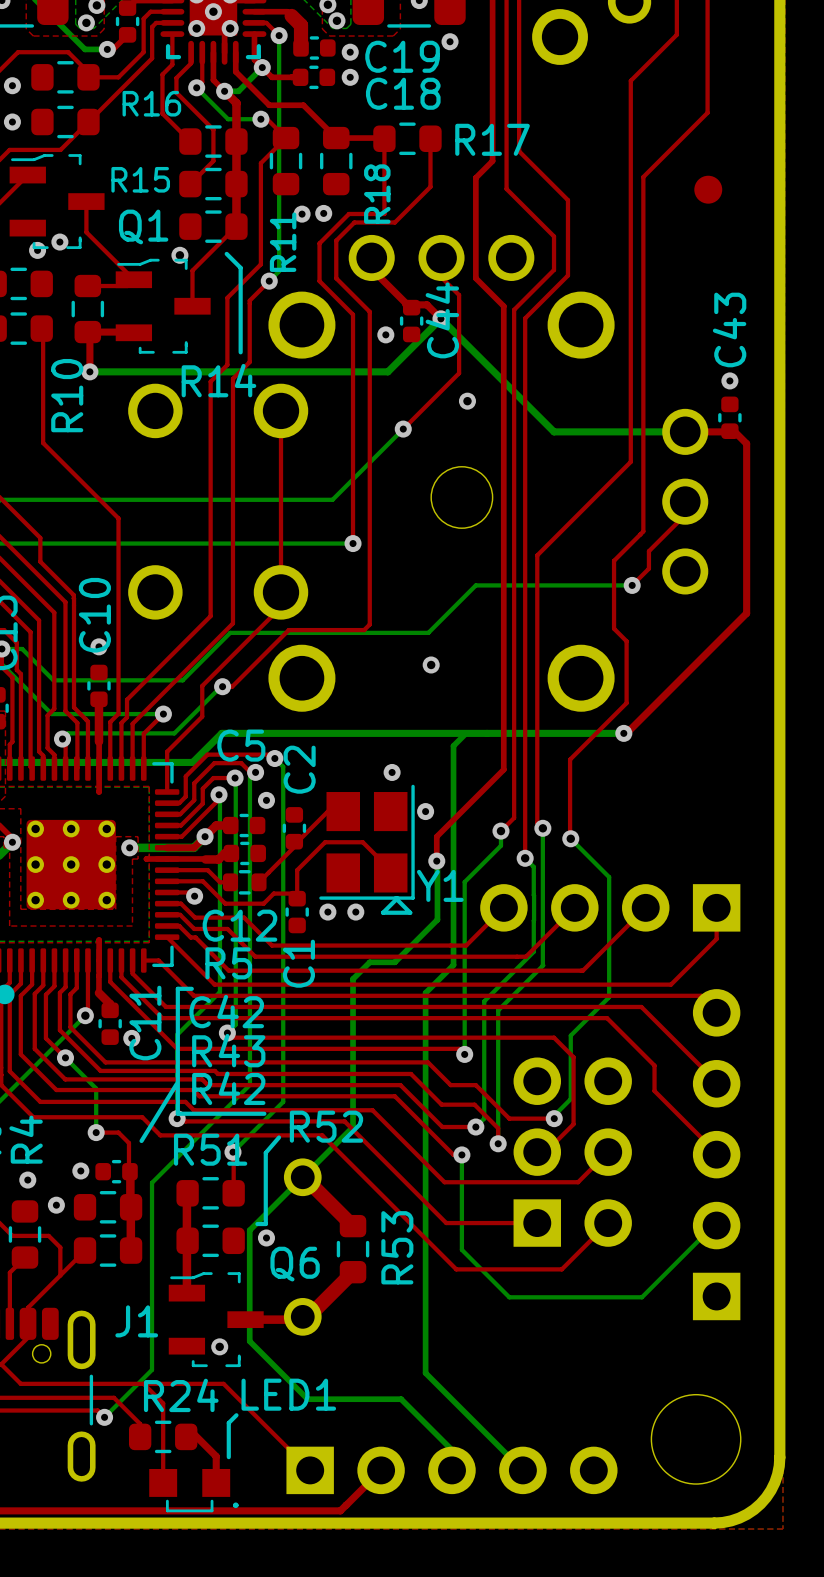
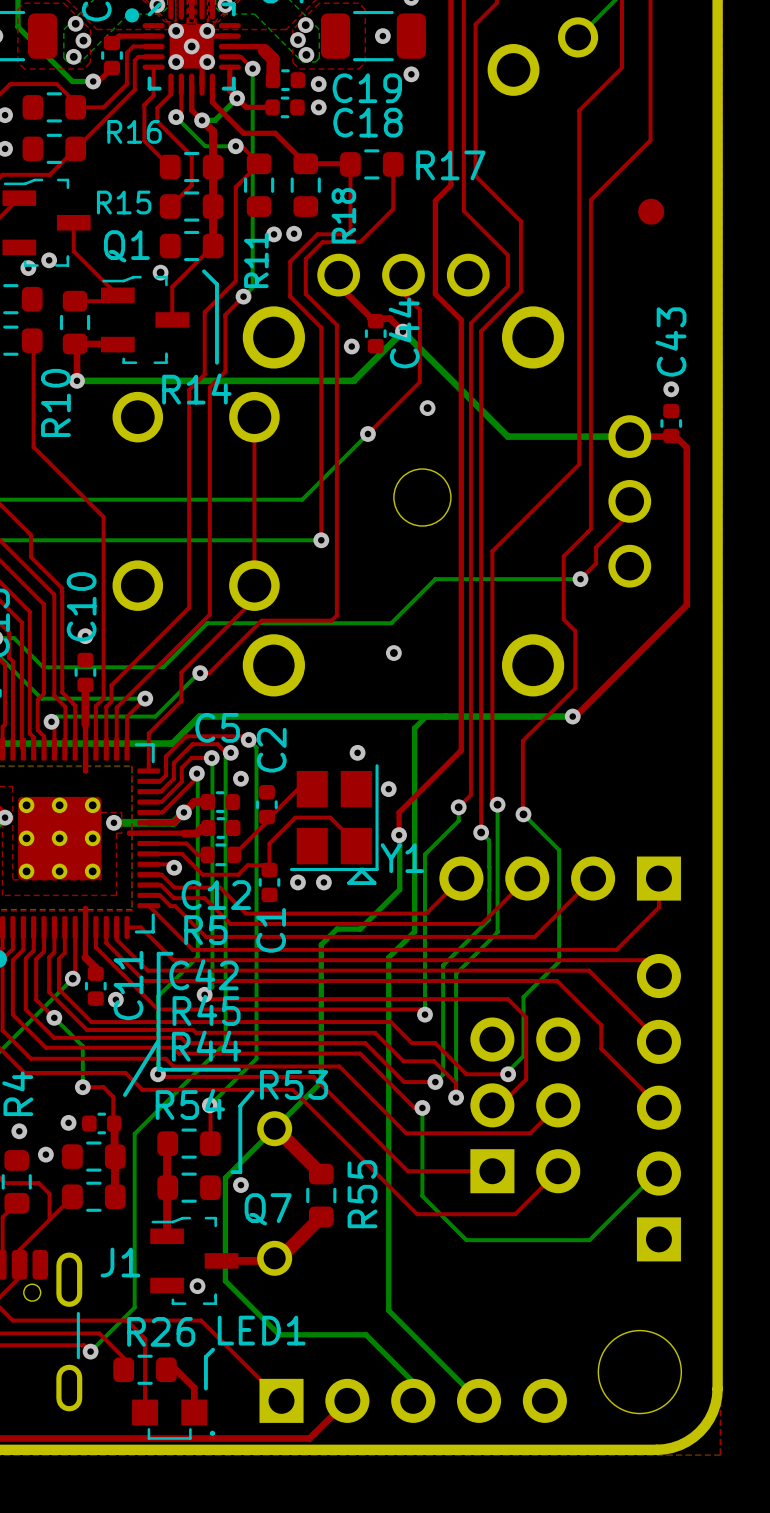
R43 name: R43 (228, 1050) -> R45 (206, 1010)
R42 name: R42 (228, 1088) -> R44 (206, 1046)
R52 name: R52 (326, 1126) -> R54 (190, 1104)
R51 name: R51 (210, 1149) -> R53 (294, 1084)
R53 name: R53 (397, 1247) -> R55 (362, 1194)
Q6 name: Q6 (295, 1264) -> Q7 (268, 1209)
R24 name: R24 (181, 1395) -> R26 (161, 1331)

